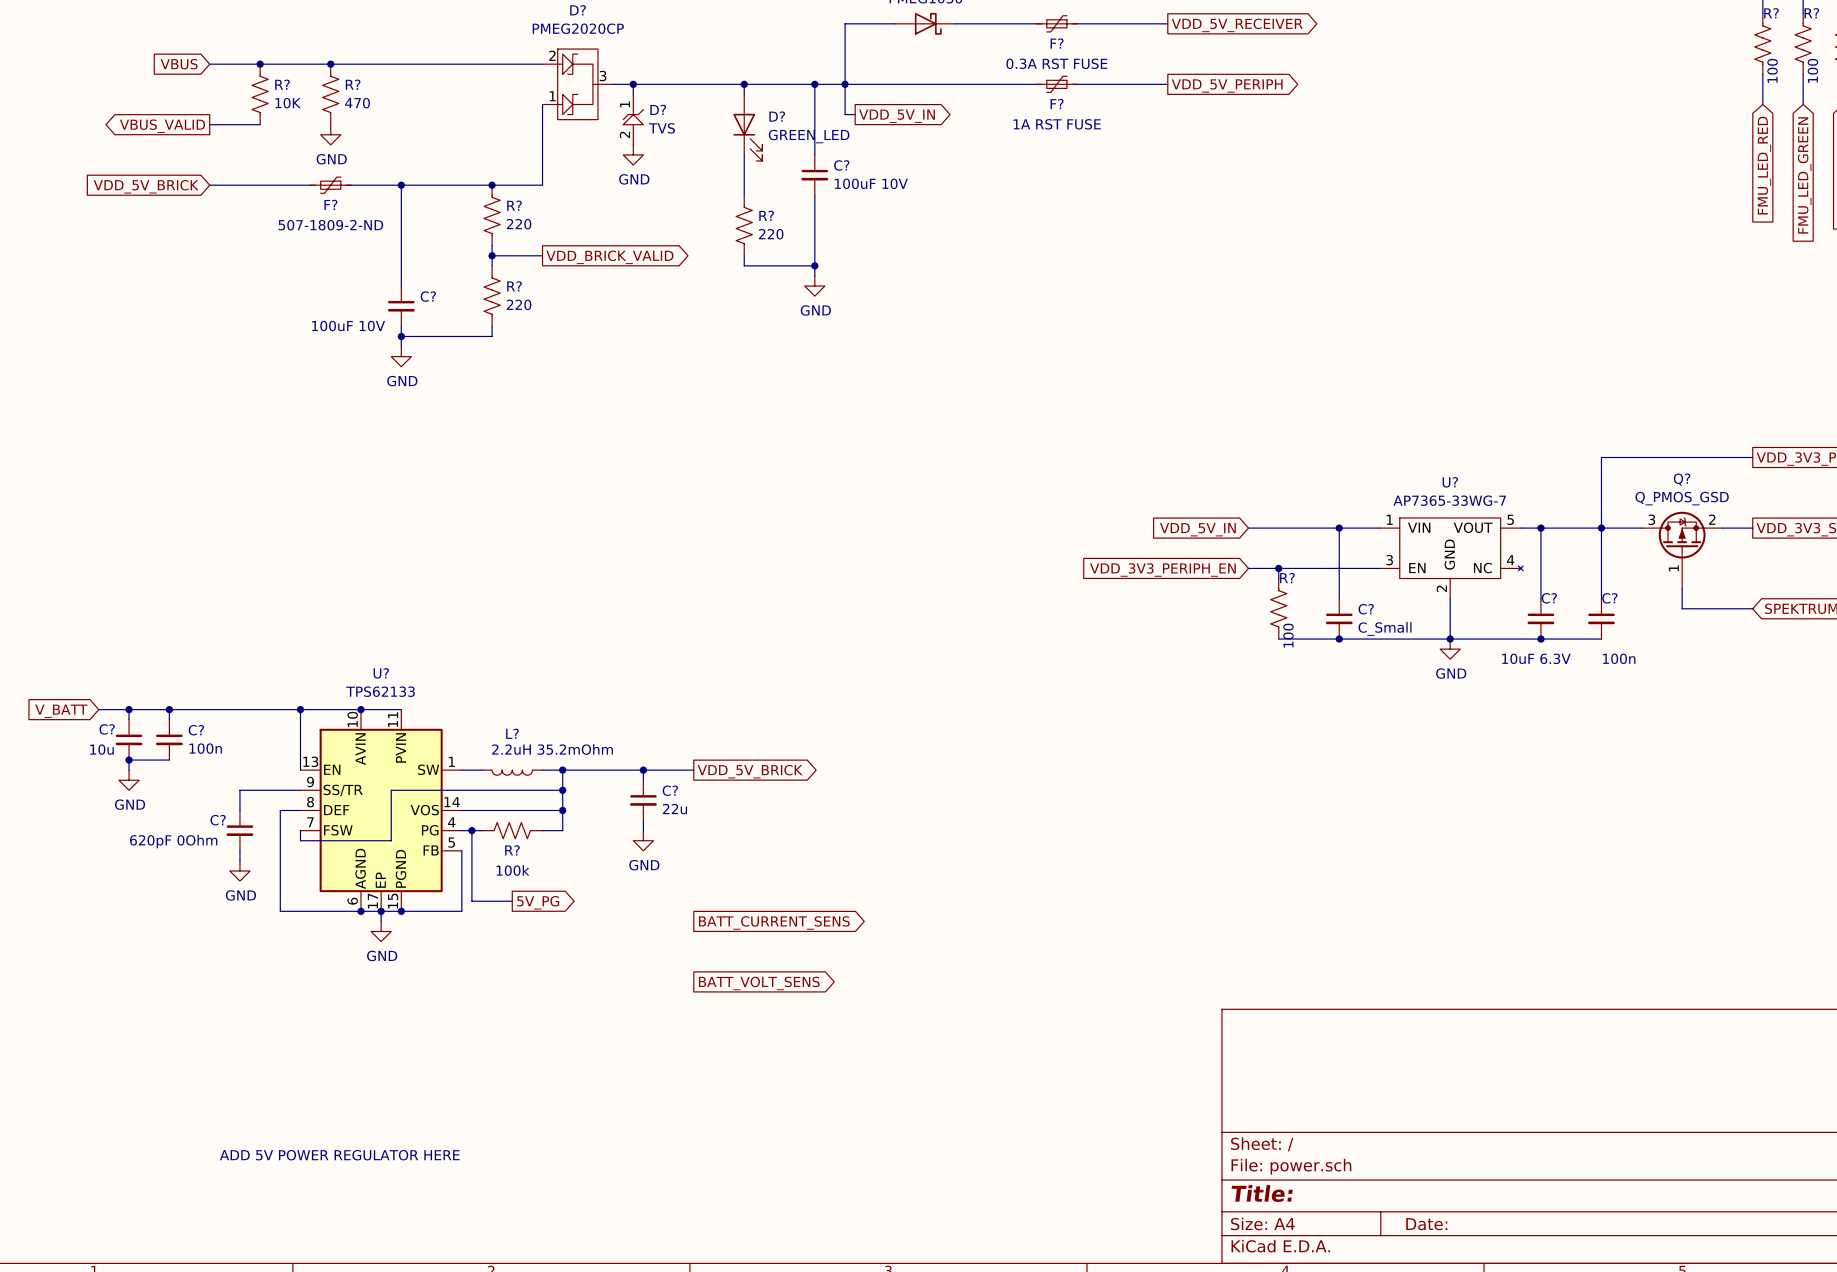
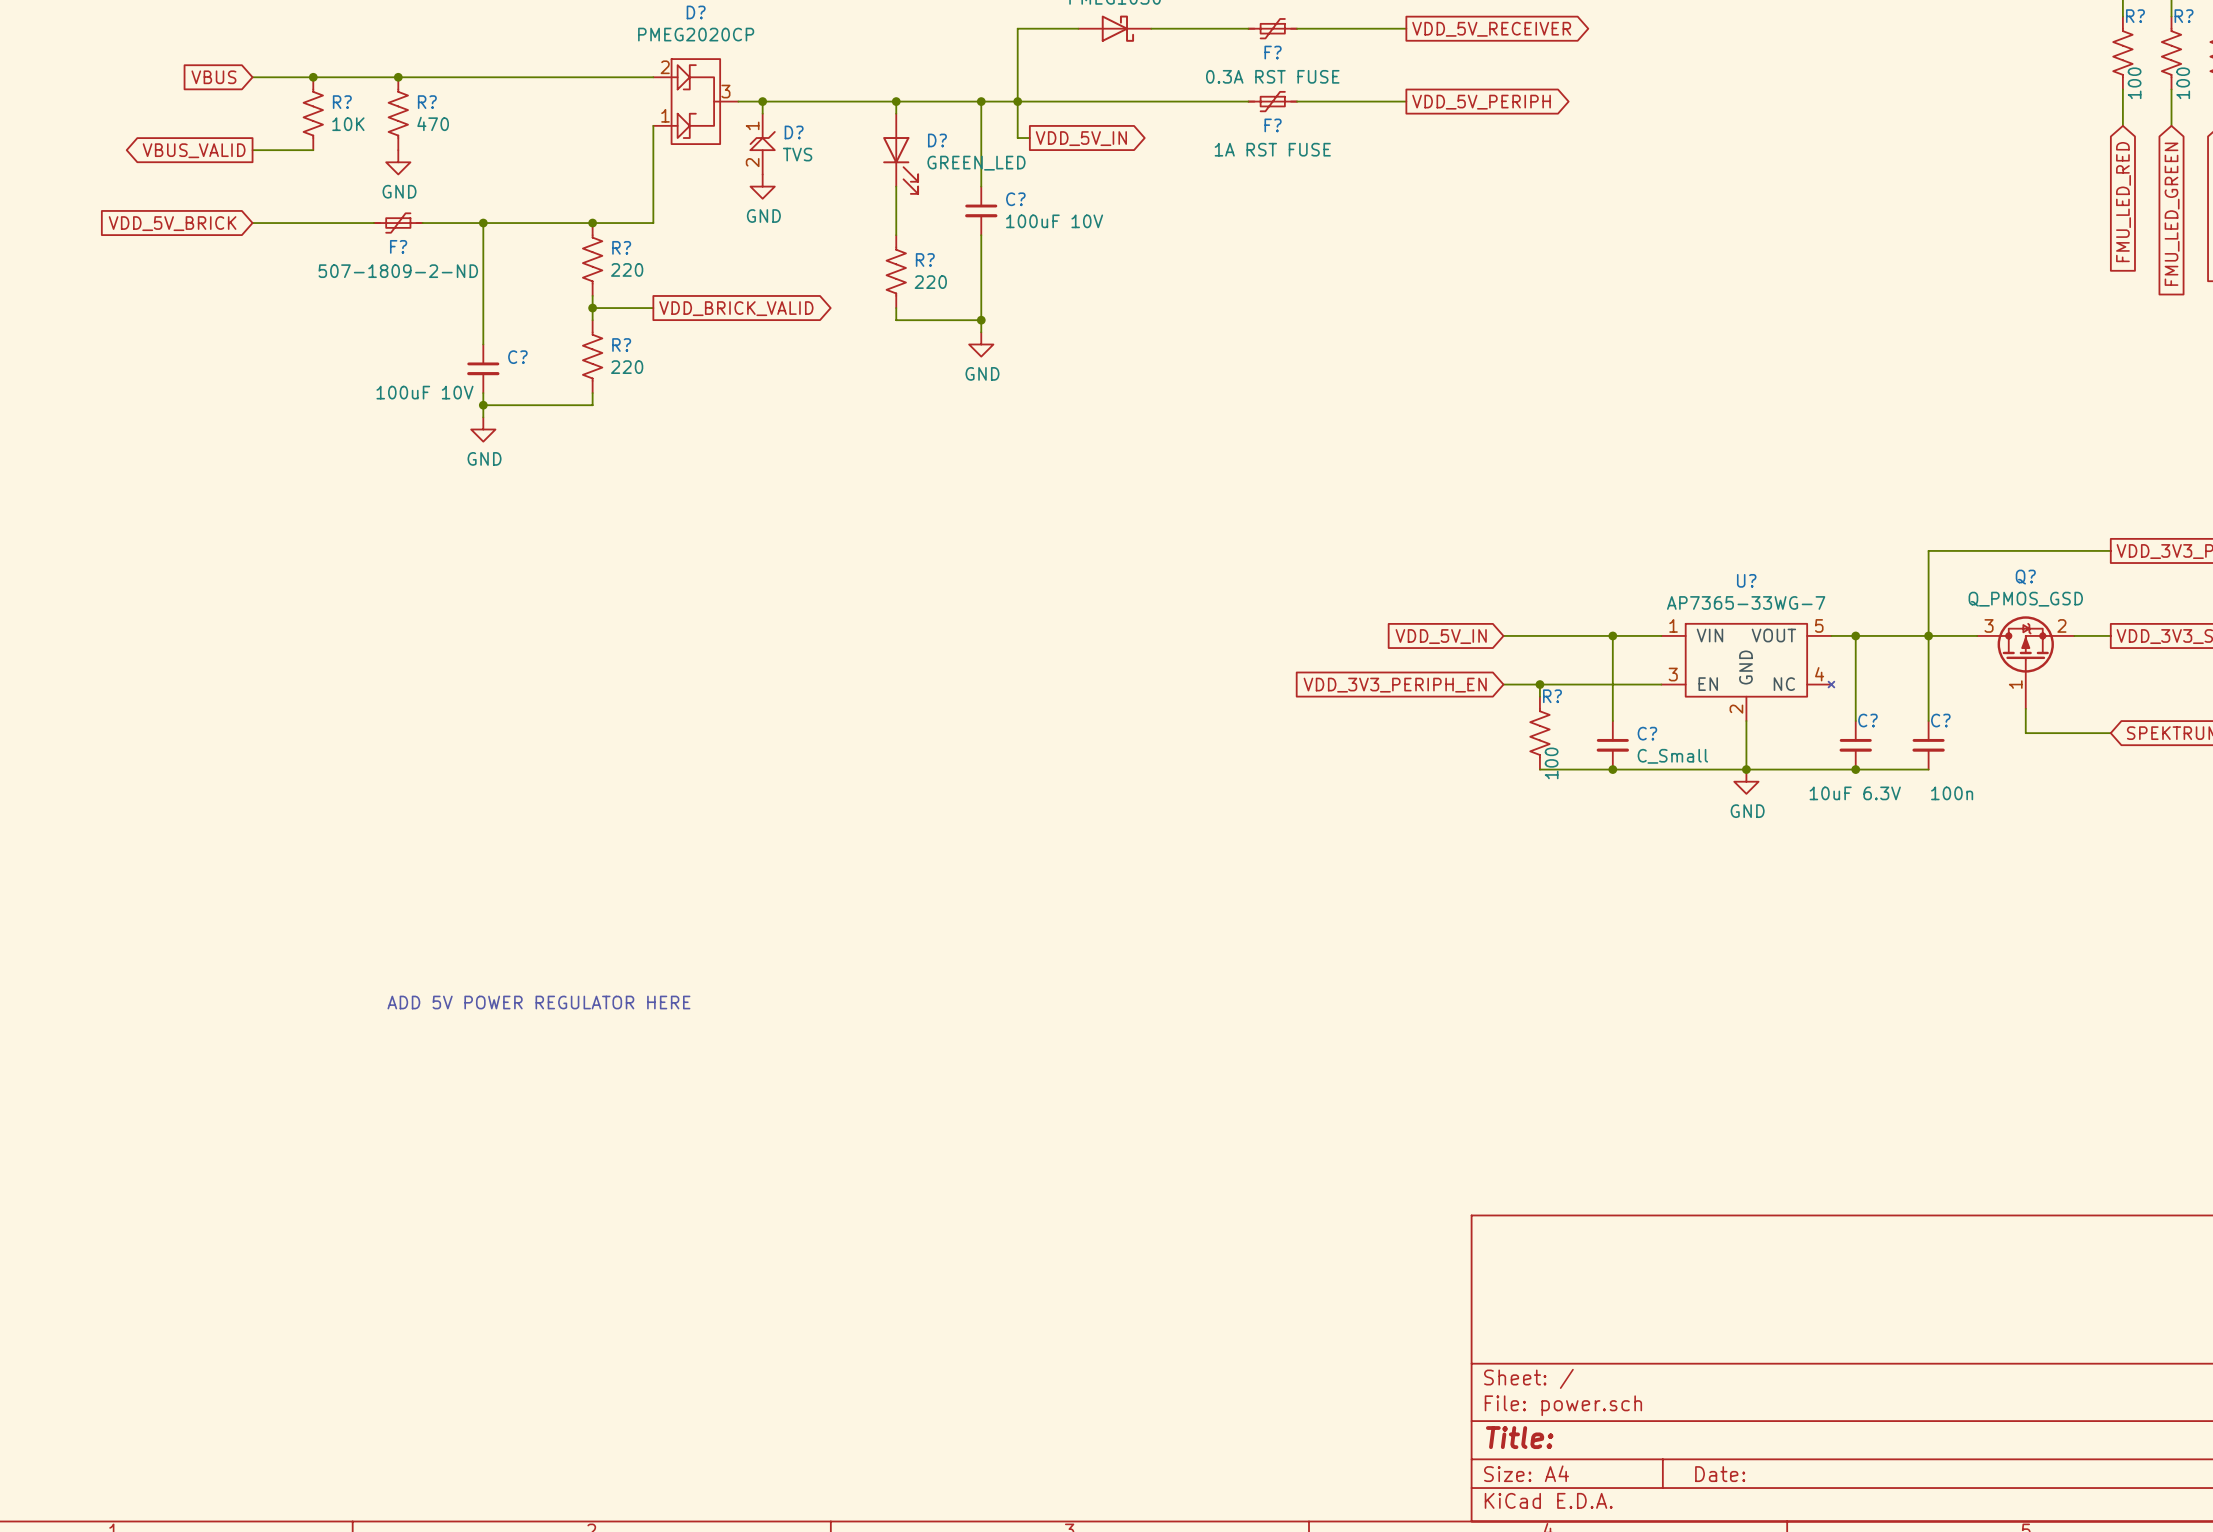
wire: (98, 709) (401, 709) -> none
wire: (129, 709) (129, 719) -> none
junction: (129, 709) -> none
wire: (169, 709) (169, 719) -> none
junction: (169, 709) -> none
wire: (300, 709) (300, 770) -> none
junction: (300, 709) -> none
junction: (360, 709) -> none
global label: V_BATT (61, 711) -> none
C?: 10u (129, 739) -> none
C?: 100n (169, 739) -> none
junction: (129, 760) -> none
wire: (169, 760) (129, 760) (129, 770) -> none
wire: (461, 770) (482, 770) -> none
wire: (542, 770) (693, 770) -> none
wire: (562, 770) (562, 830) (542, 830) -> none
junction: (562, 770) -> none
wire: (643, 770) (643, 780) -> none
junction: (643, 770) -> none
global label: VDD_5V_BRICK (750, 771) -> none
L?: 2.2uH 35.2mOhm (512, 772) -> none
power symbol: GND (129, 780) -> none
wire: (300, 790) (239, 790) (239, 810) -> none
wire: (562, 790) (391, 790) (391, 840) (300, 840) (300, 830) -> none
junction: (562, 790) -> none
C?: 22u (643, 800) -> none
wire: (300, 810) (280, 810) (280, 911) (461, 911) (461, 850) -> none
U?: TPS62133 (381, 810) -> none
wire: (461, 810) (562, 810) -> none
junction: (562, 810) -> none
wire: (643, 820) (643, 830) -> none
C?: 620pF 0Ohm (239, 830) -> none
wire: (461, 830) (482, 830) -> none
wire: (471, 830) (471, 901) (512, 901) -> none
junction: (471, 830) -> none
R?: 100k (512, 830) -> none
text: none -> ADD 5V POWER REGULATOR HERE (538, 1002)
power symbol: GND (643, 840) -> none
wire: (239, 850) (239, 860) -> none
power symbol: GND (239, 870) -> none
global label: 5V_PG (538, 902) -> none
junction: (360, 911) -> none
wire: (381, 911) (381, 921) -> none
junction: (381, 911) -> none
junction: (401, 911) -> none
global label: BATT_CURRENT_SENS (774, 922) -> none
power symbol: GND (381, 931) -> none
global label: BATT_VOLT_SENS (759, 983) -> none
text: ADD 5V POWER REGULATOR HERE (339, 1155) -> none

